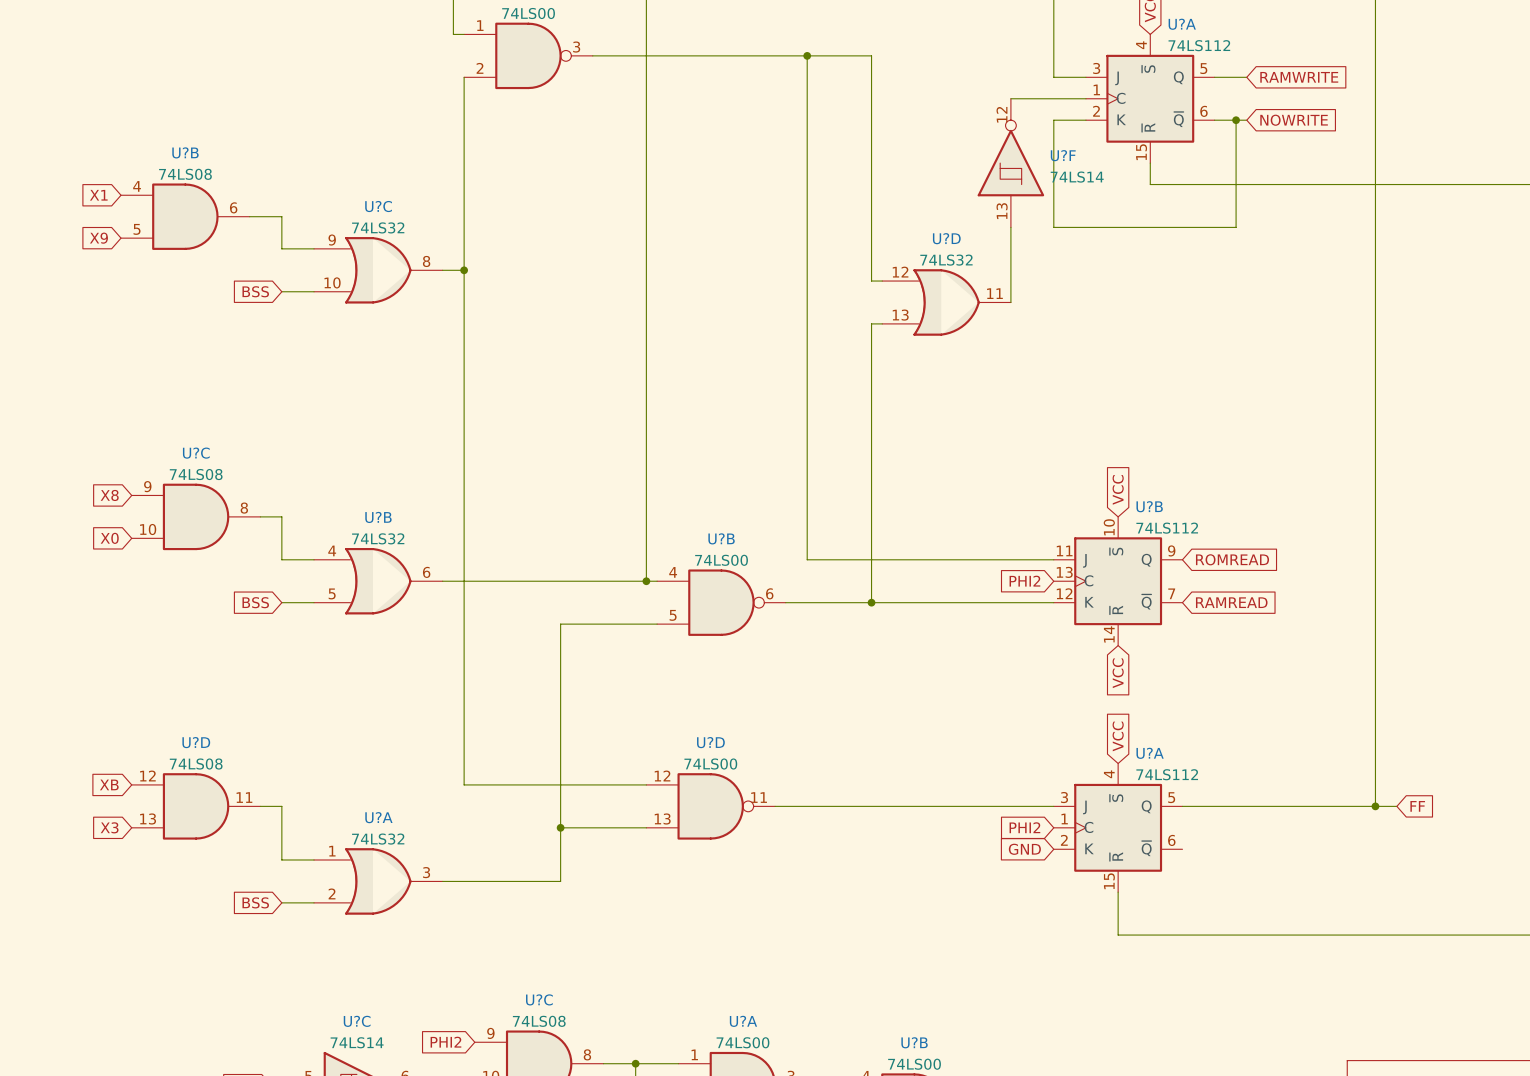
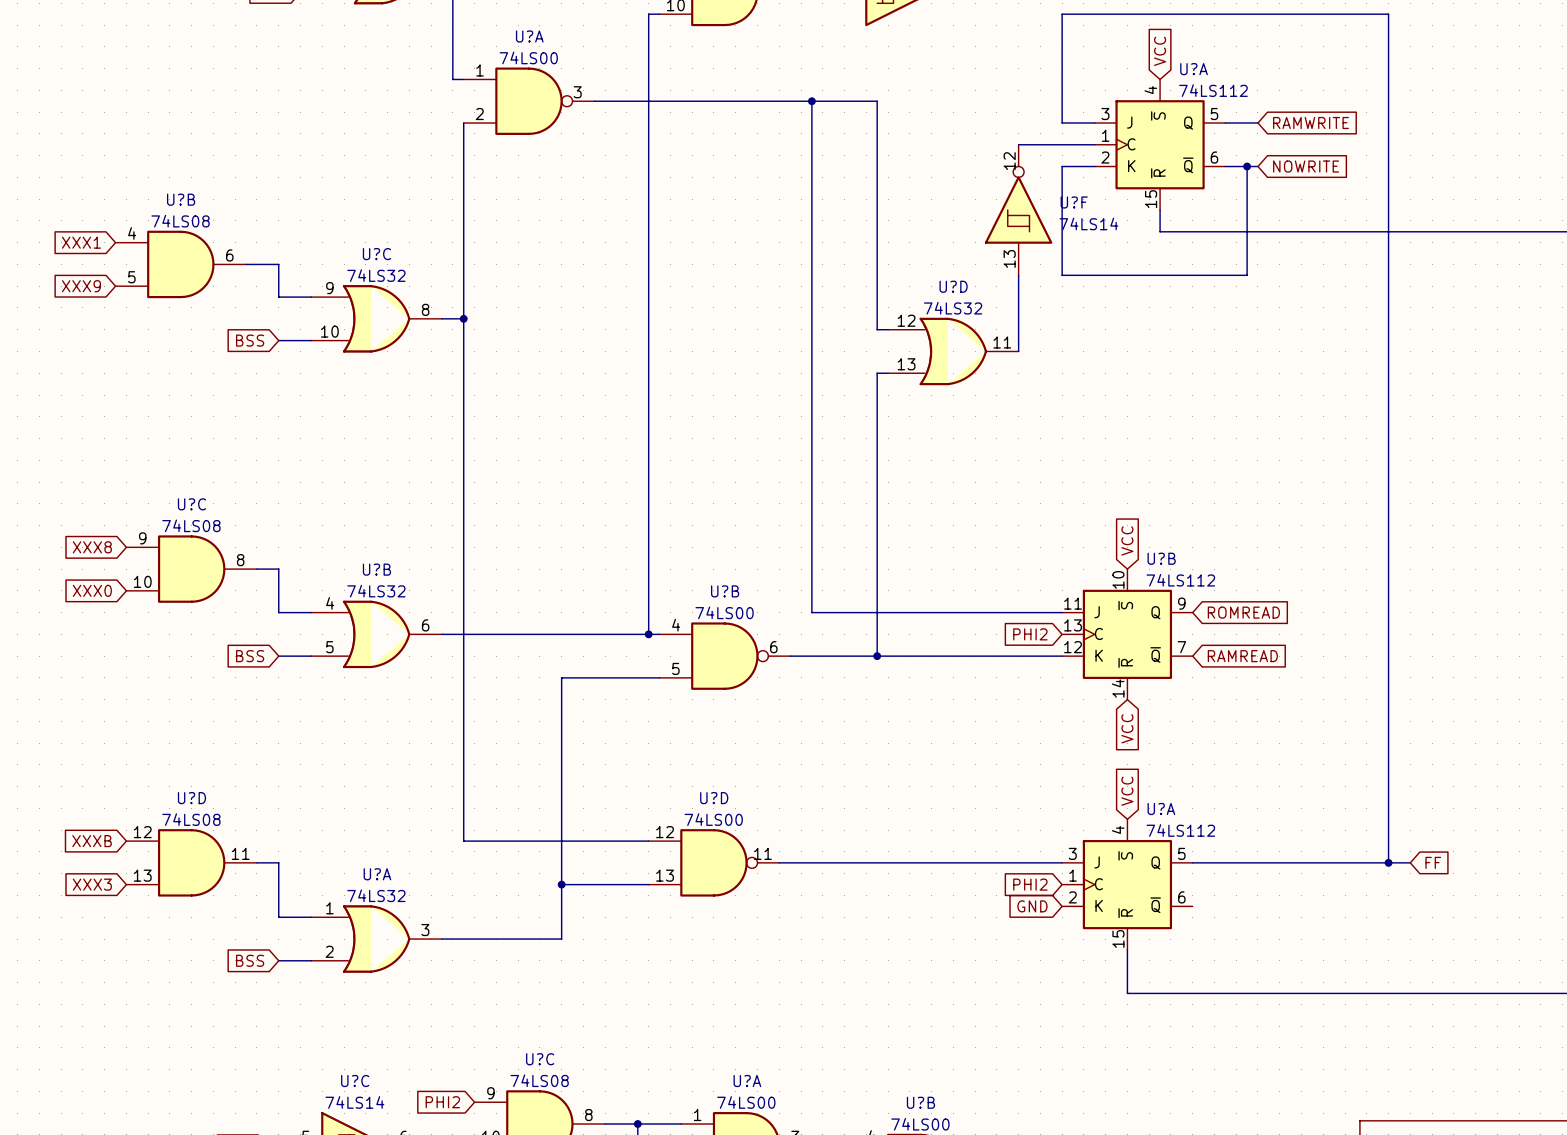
global label: X1 (98, 195) -> XXX1 (81, 242)
global label: X9 (98, 238) -> XXX9 (81, 286)
global label: X8 (109, 495) -> XXX8 (92, 547)
global label: X0 (109, 538) -> XXX0 (92, 590)
global label: XB (109, 784) -> XXXB (92, 841)
global label: X3 (109, 827) -> XXX3 (92, 884)

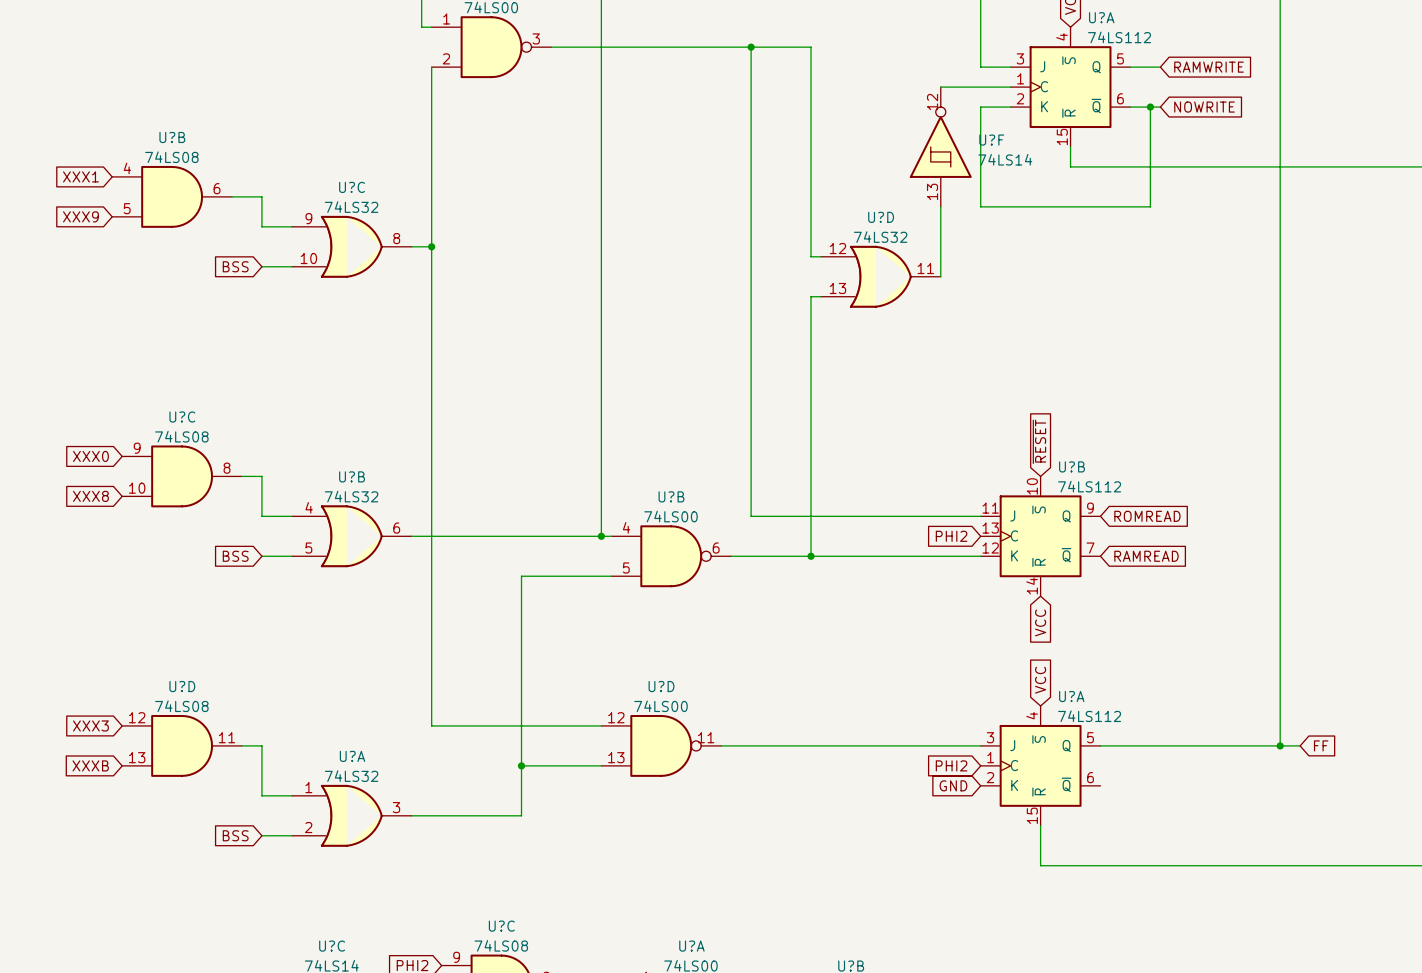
global label: VCC (1127, 540) -> ~{RESET} (1039, 441)
global label: XXX8 (92, 547) -> XXX0 (90, 456)
global label: XXX0 (92, 590) -> XXX8 (90, 496)
global label: XXXB (92, 841) -> XXX3 (90, 725)
global label: XXX3 (92, 884) -> XXXB (90, 765)

